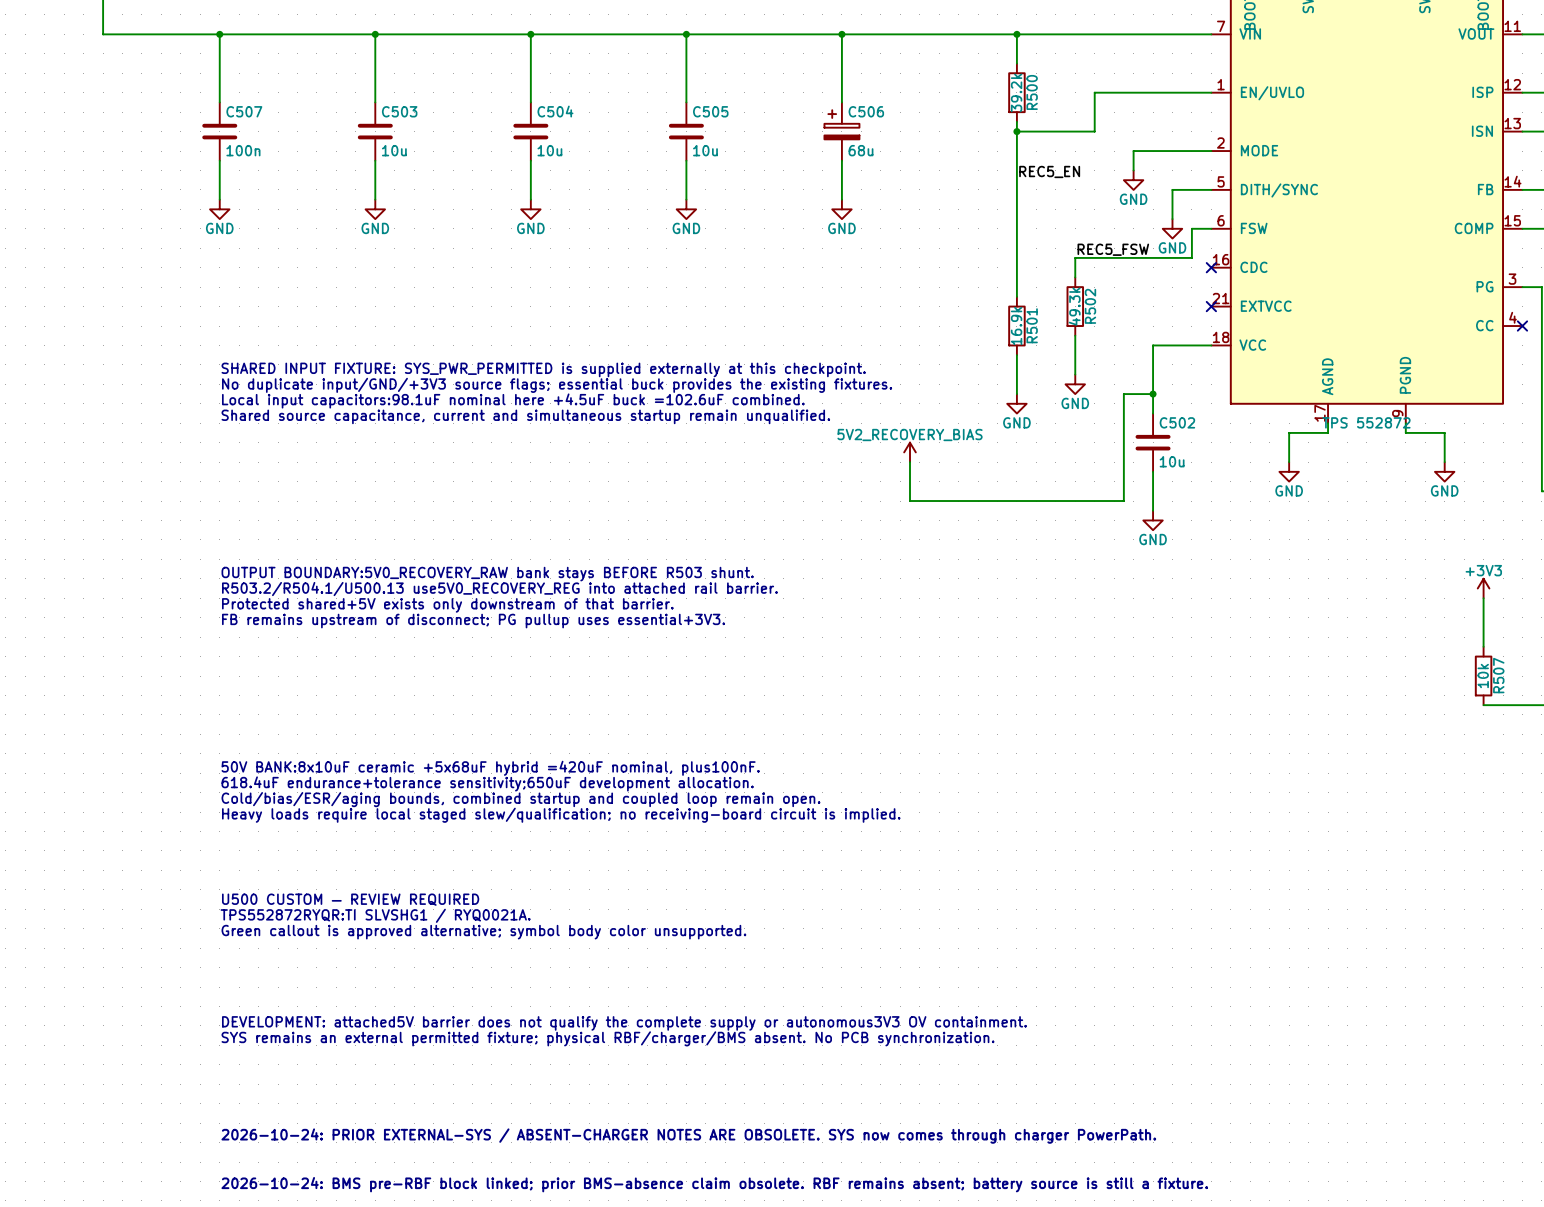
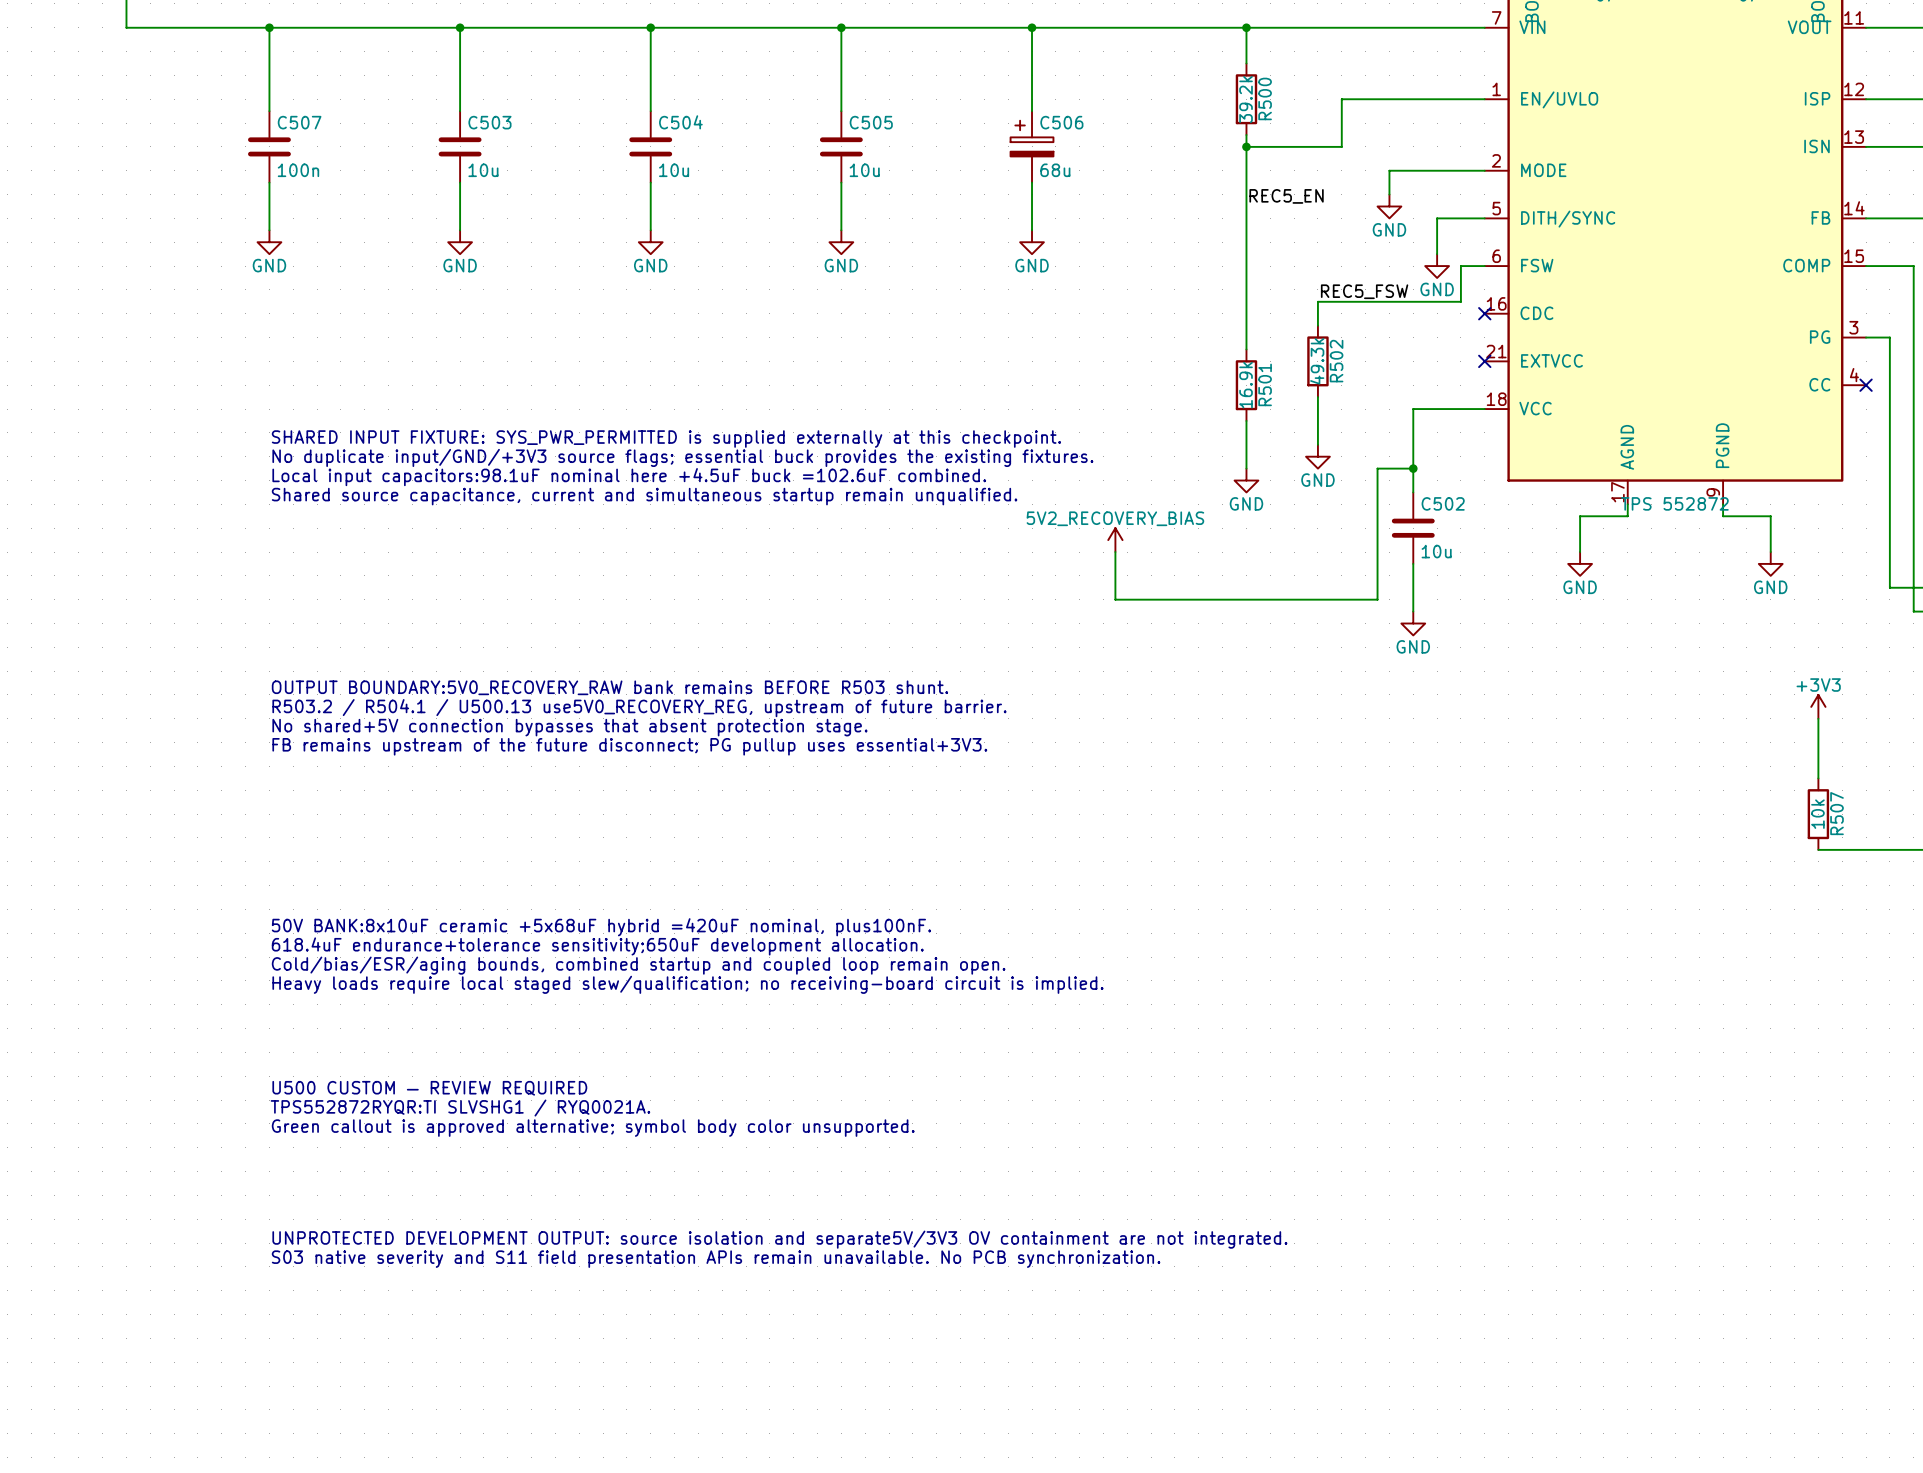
text: OUTPUT BOUNDARY:5V0_RECOVERY_RAW bank stays BEFORE R503 shunt. (487, 574) -> OUTPUT BOUNDARY:5V0_RECOVERY_RAW bank remains BEFORE R503 shunt. (609, 687)
text: R503.2/R504.1/U500.13 use5V0_RECOVERY_REG into attached rail barrier. (499, 589) -> R503.2 / R504.1 / U500.13 use5V0_RECOVERY_REG, upstream of future barrier. (639, 708)
text: Protected shared+5V exists only downstream of that barrier. (447, 605) -> No shared+5V connection bypasses that absent protection stage. (569, 727)
text: FB remains upstream of disconnect; PG pullup uses essential+3V3. (473, 621) -> FB remains upstream of the future disconnect; PG pullup uses essential+3V3. (629, 746)
text: DEVELOPMENT: attached5V barrier does not qualify the complete supply or autonomous3V3 OV containment. (624, 1023) -> UNPROTECTED DEVELOPMENT OUTPUT: source isolation and separate5V/3V3 OV containment are not integrated. (779, 1239)
text: SYS remains an external permitted fixture; physical RBF/charger/BMS absent. No PCB synchronization. (608, 1038) -> S03 native severity and S11 field presentation APIs remain unavailable. No PCB synchronization. (716, 1259)
text: 2026-10-24: PRIOR EXTERNAL-SYS / ABSENT-CHARGER NOTES ARE OBSOLETE. SYS now comes through charger PowerPath. (688, 1136) -> none
text: 2026-10-24: BMS pre-RBF block linked; prior BMS-absence claim obsolete. RBF remains absent; battery source is still a fixture. (714, 1184) -> none

